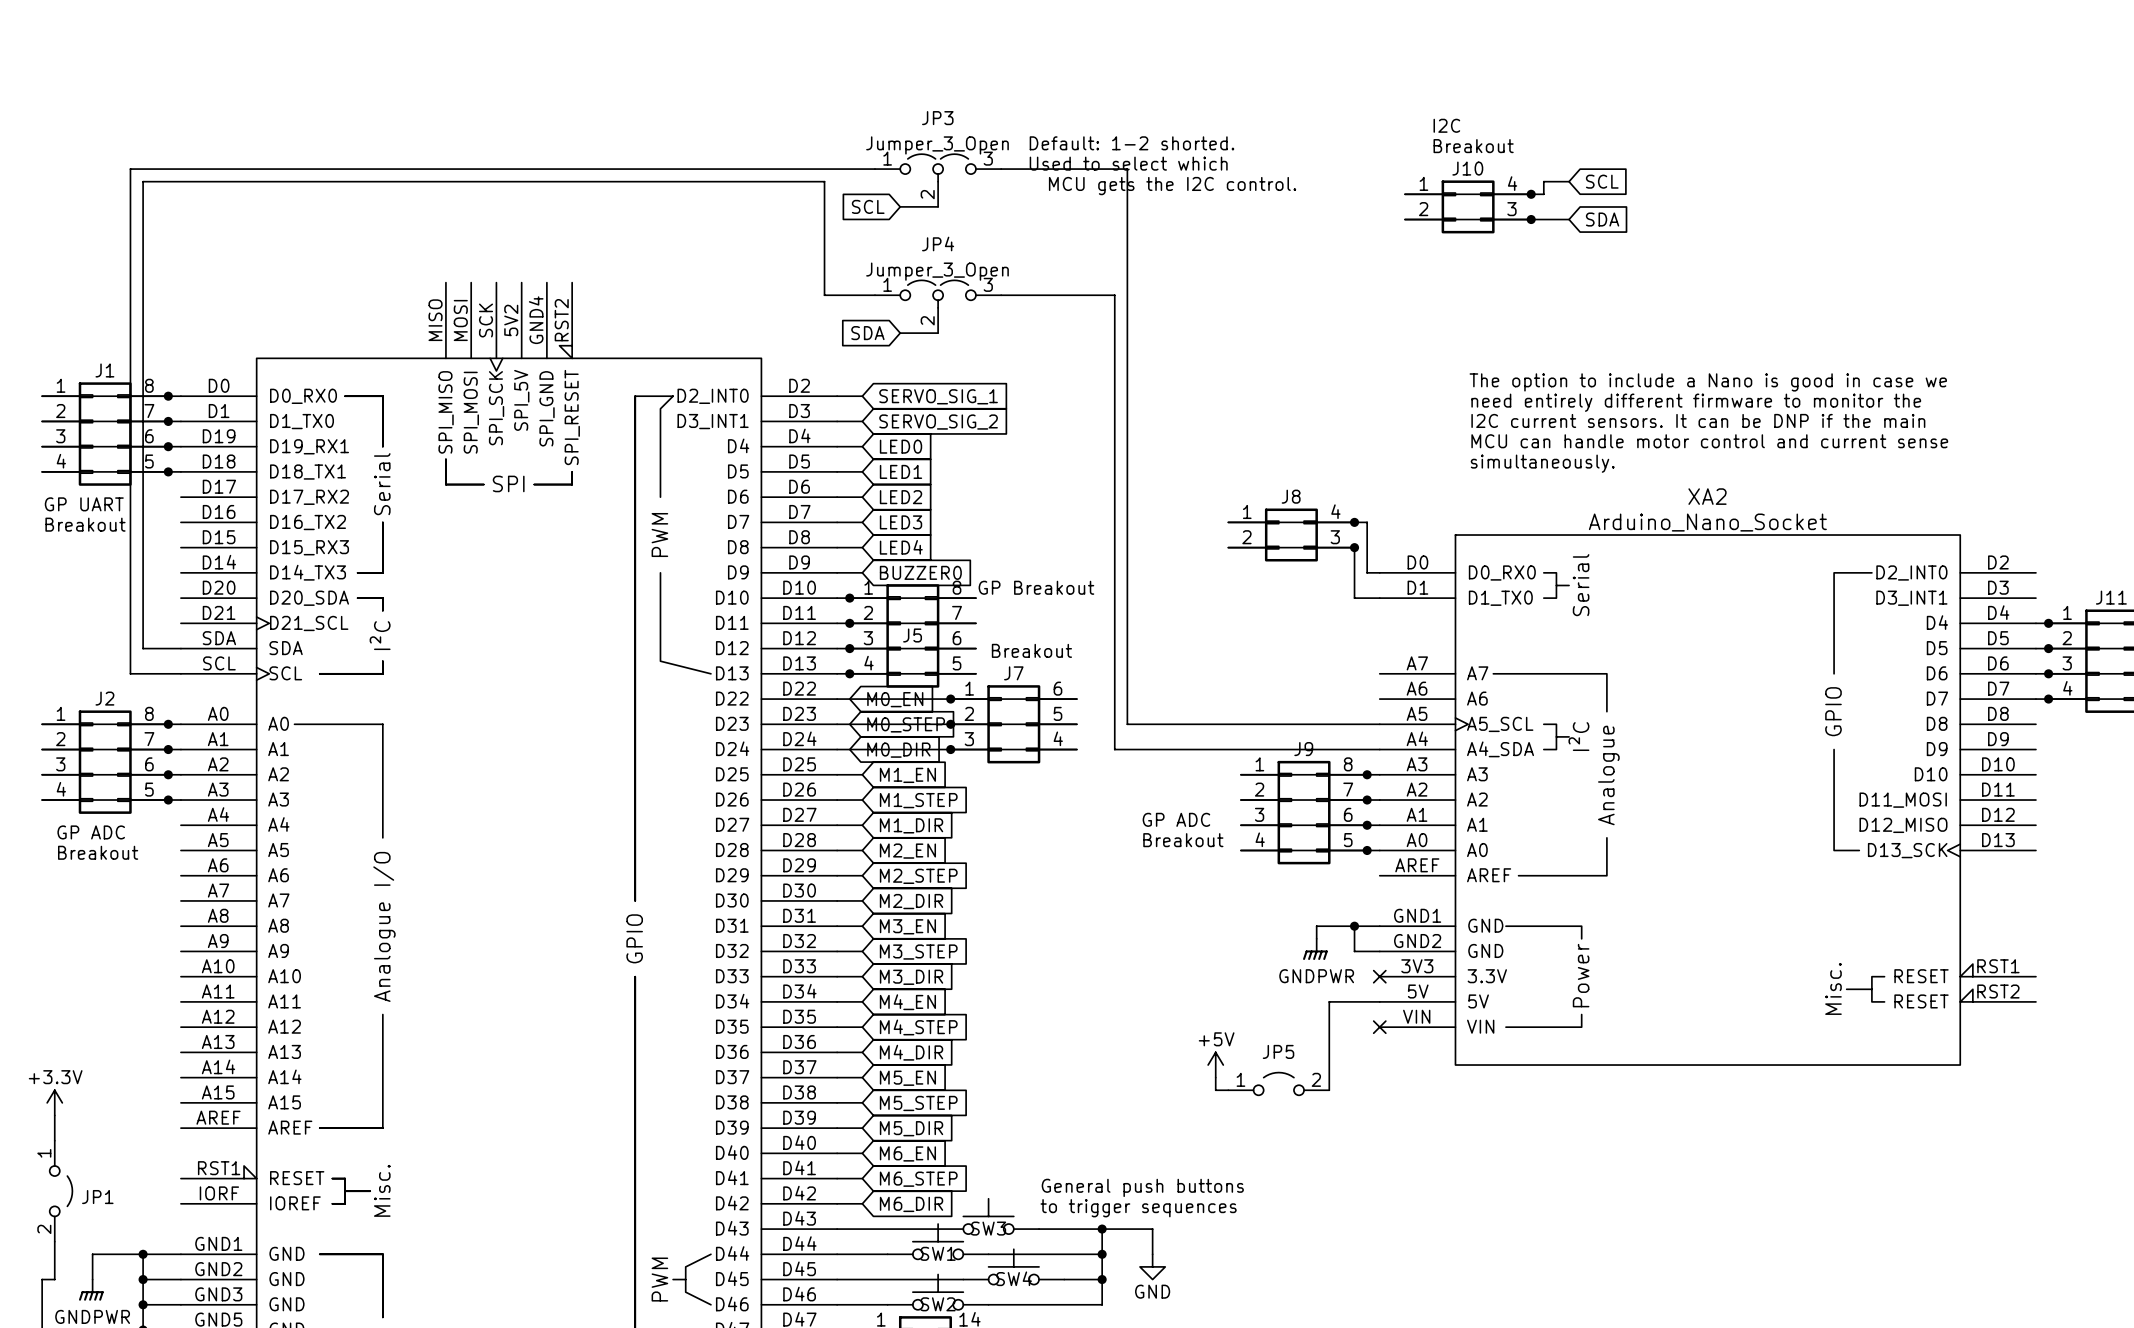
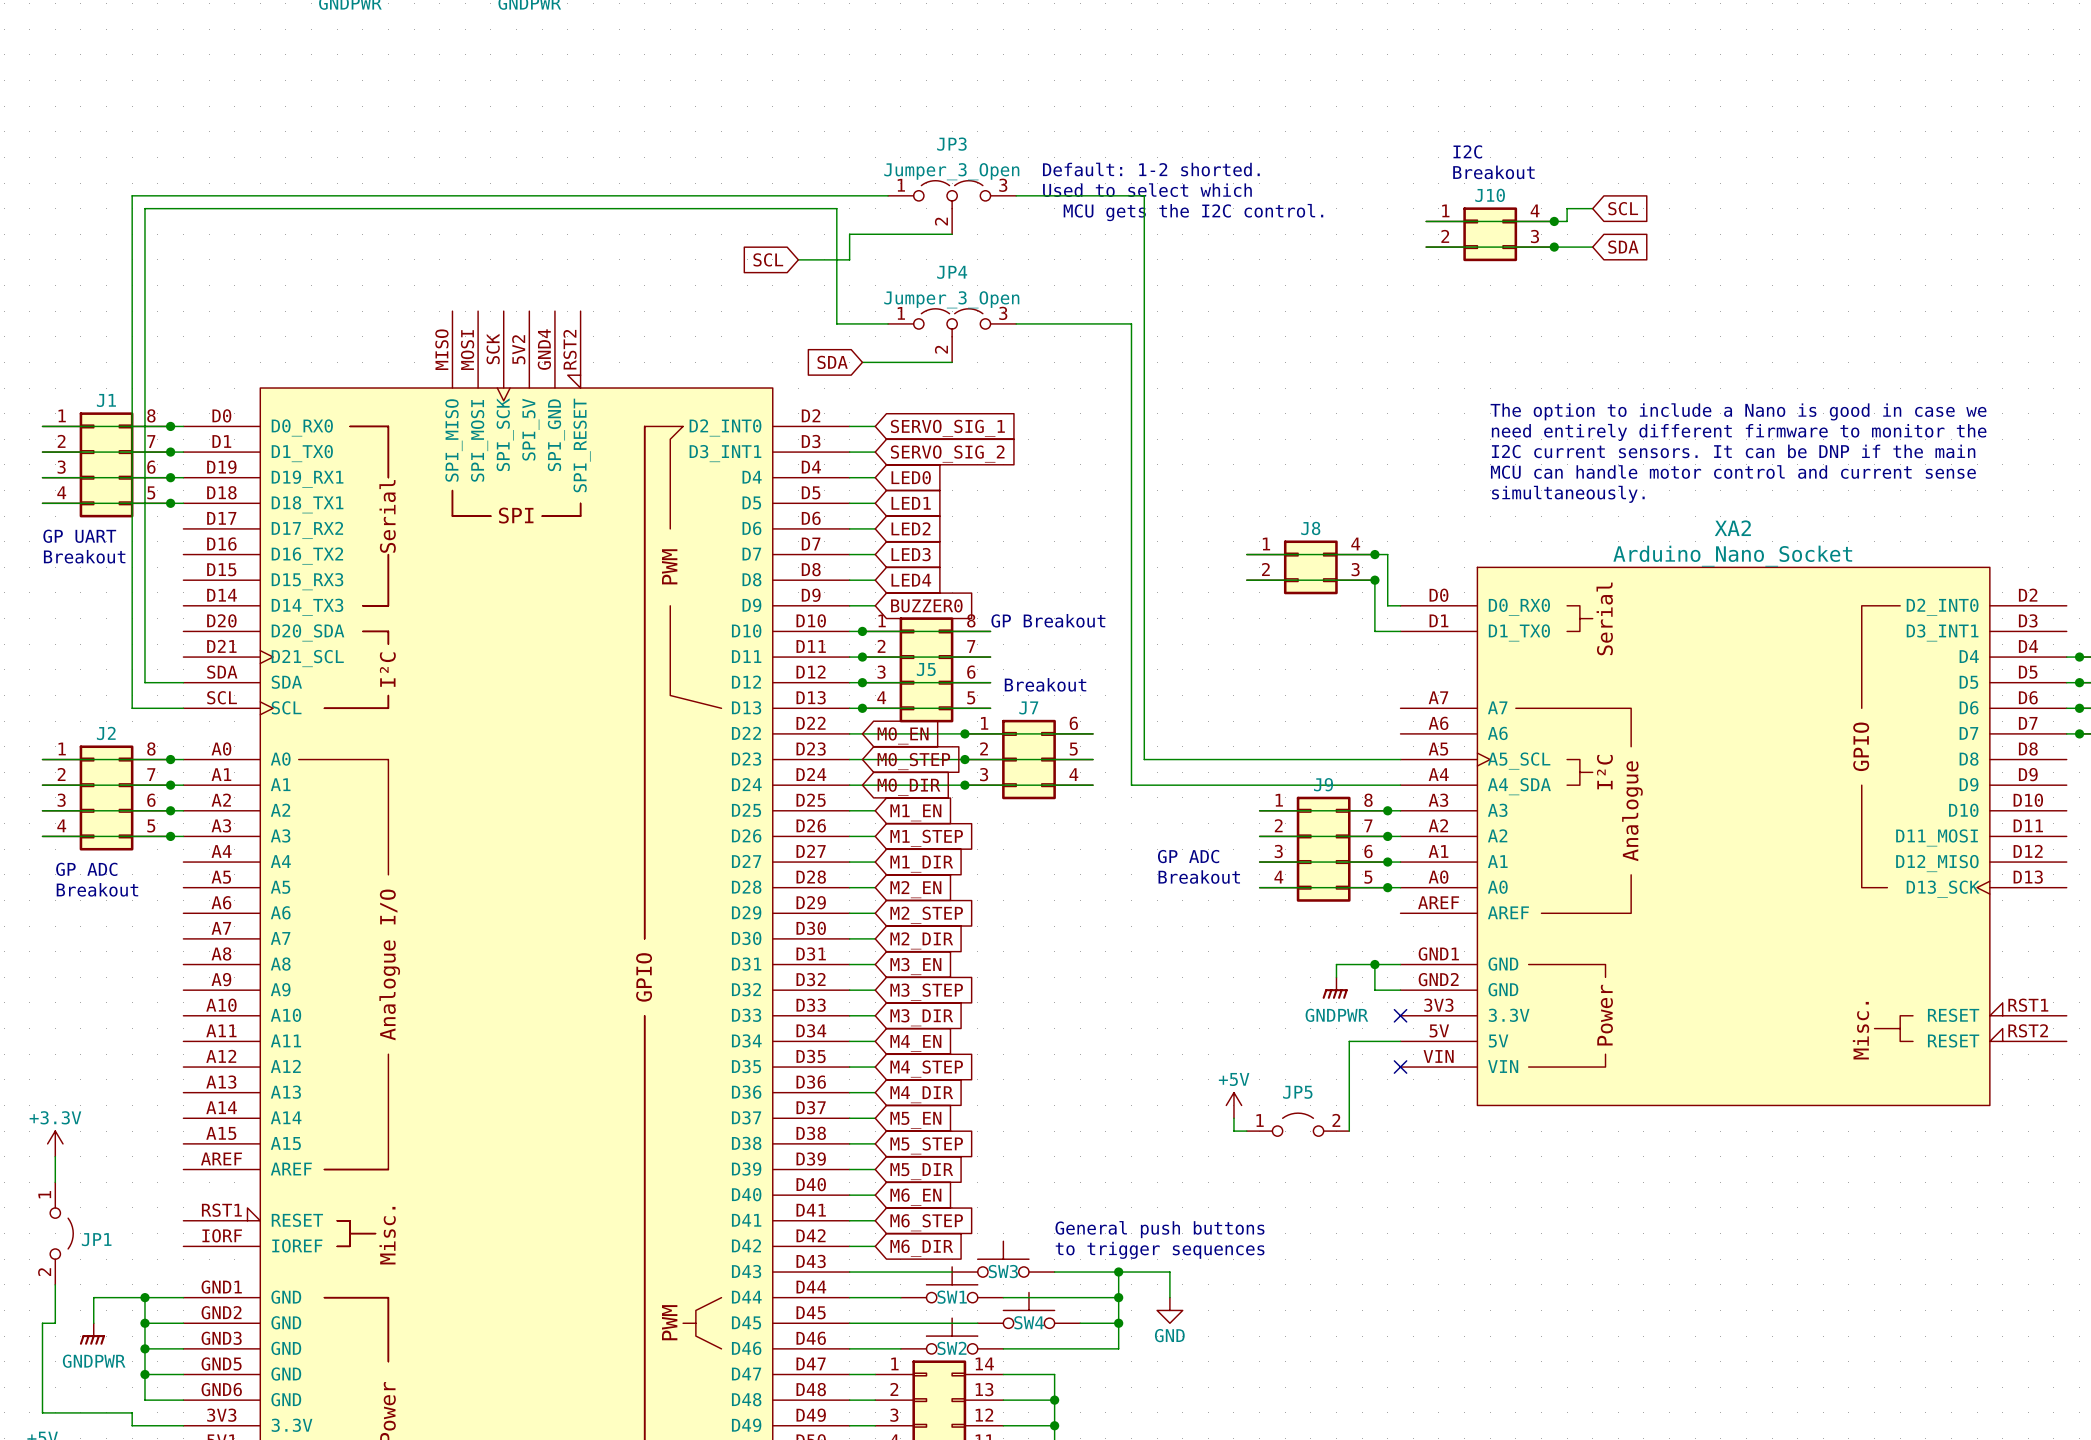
global label position: SCL (868, 206) -> SCL (768, 259)
wire: none -> (913, 234) (849, 234) (849, 259) (798, 259)
wire: none -> (862, 362) (913, 362)
global label position: SDA (867, 333) -> SDA (832, 362)

